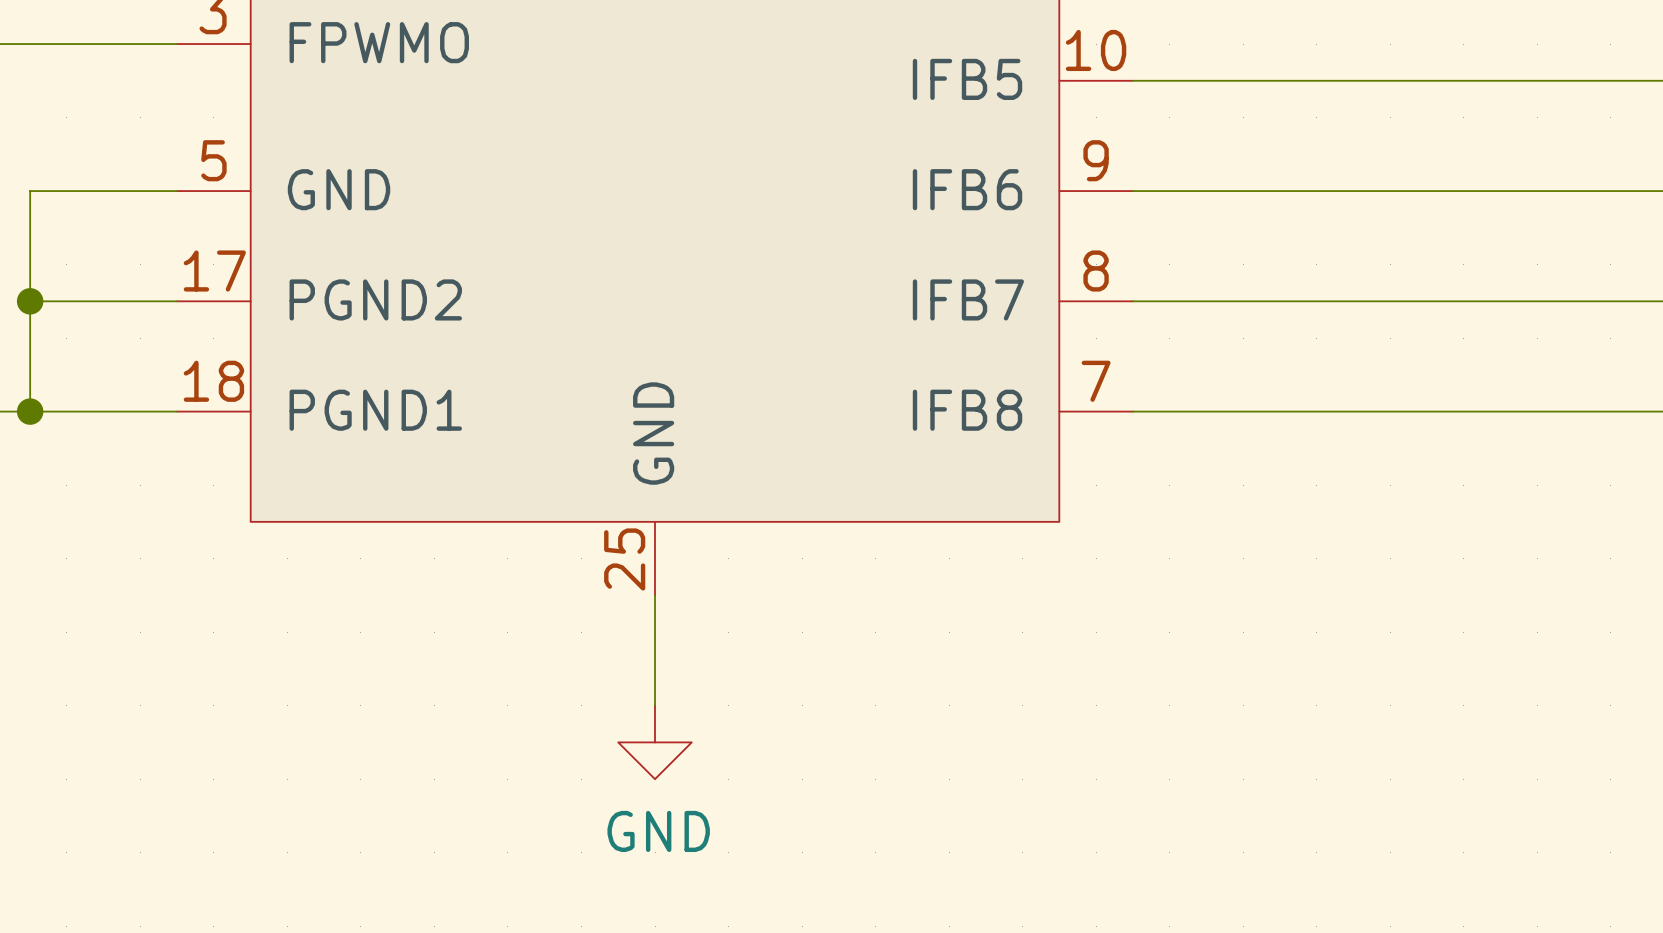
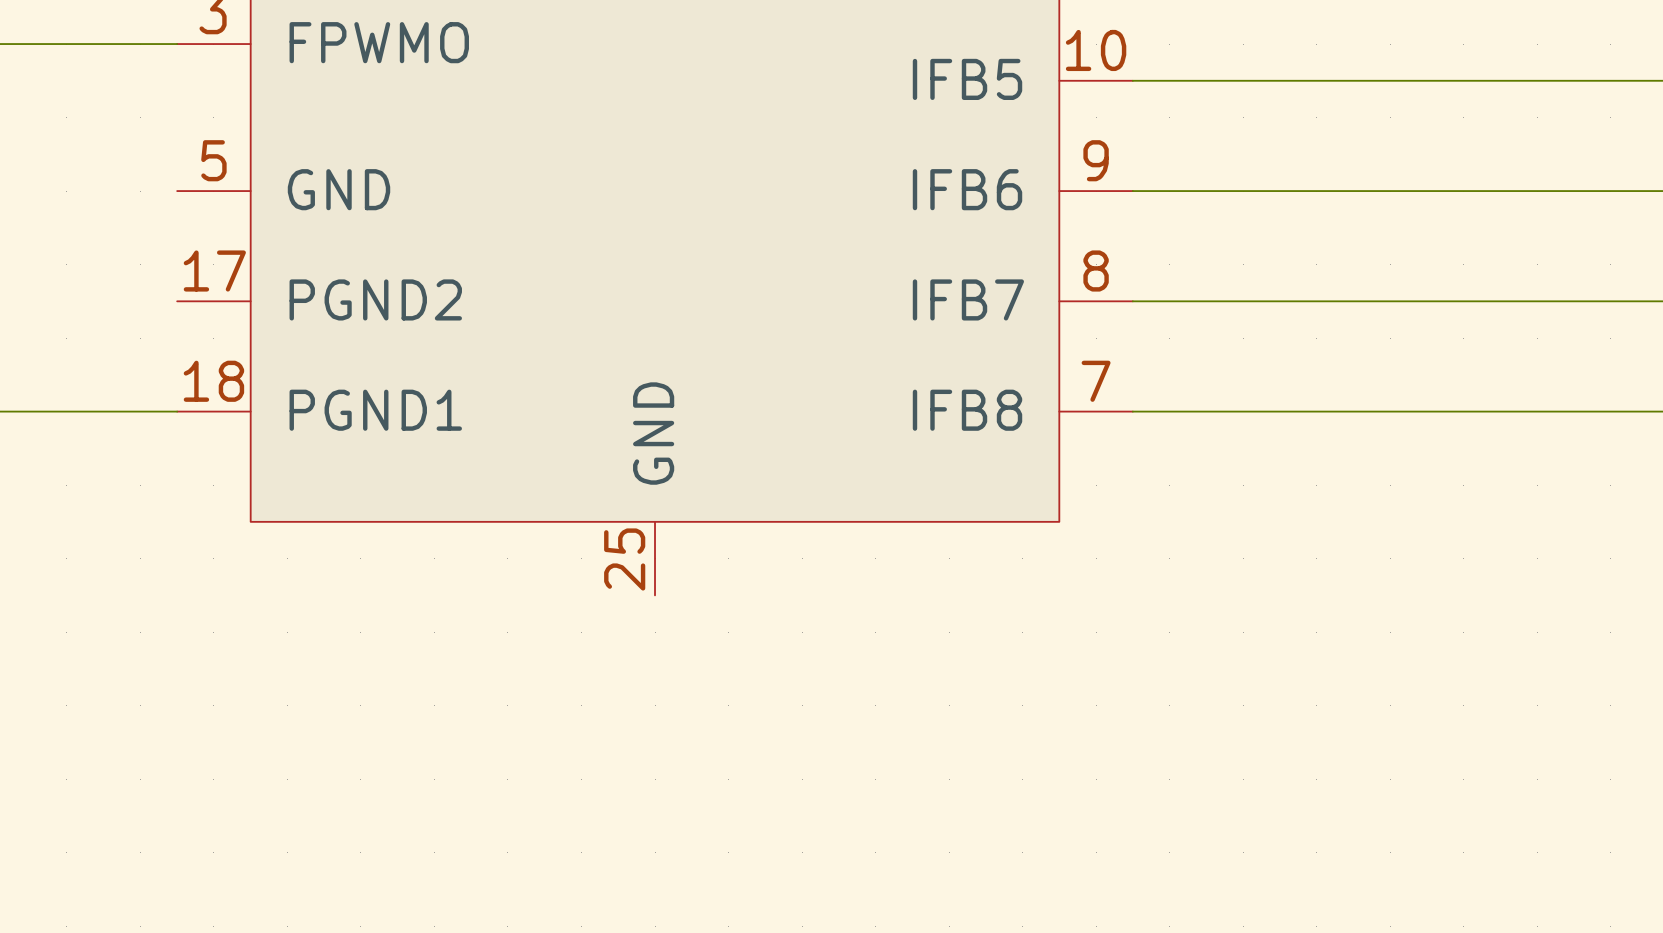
wire: (177, 191) (30, 191) (30, 411) -> none
wire: (30, 301) (177, 301) -> none
junction: (30, 301) -> none
junction: (30, 411) -> none
wire: (655, 595) (655, 705) -> none
power symbol: GND (655, 742) -> none

